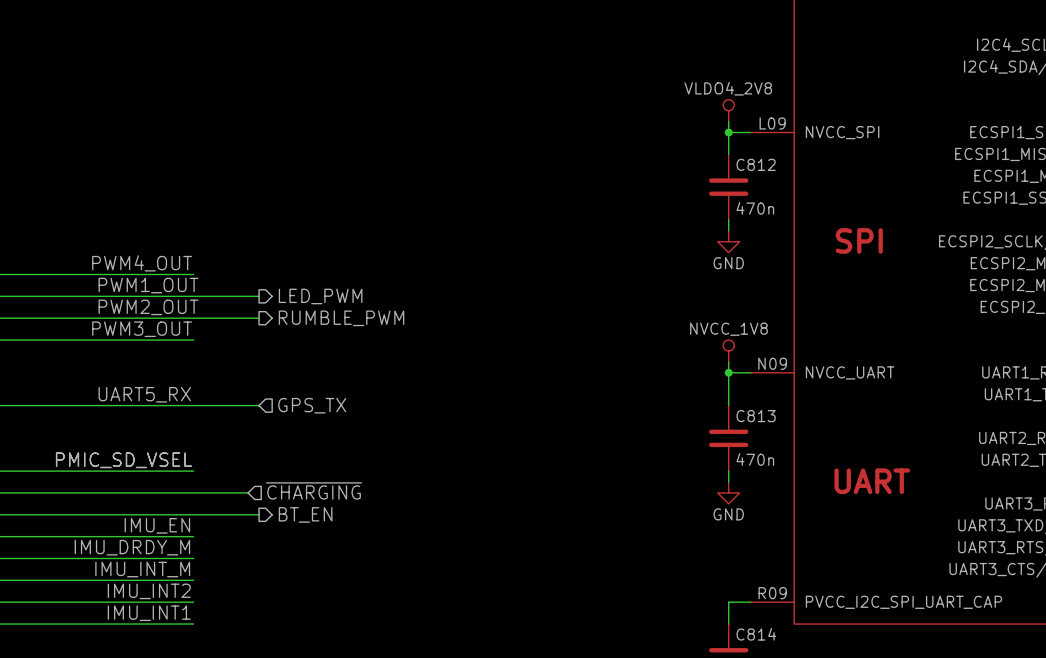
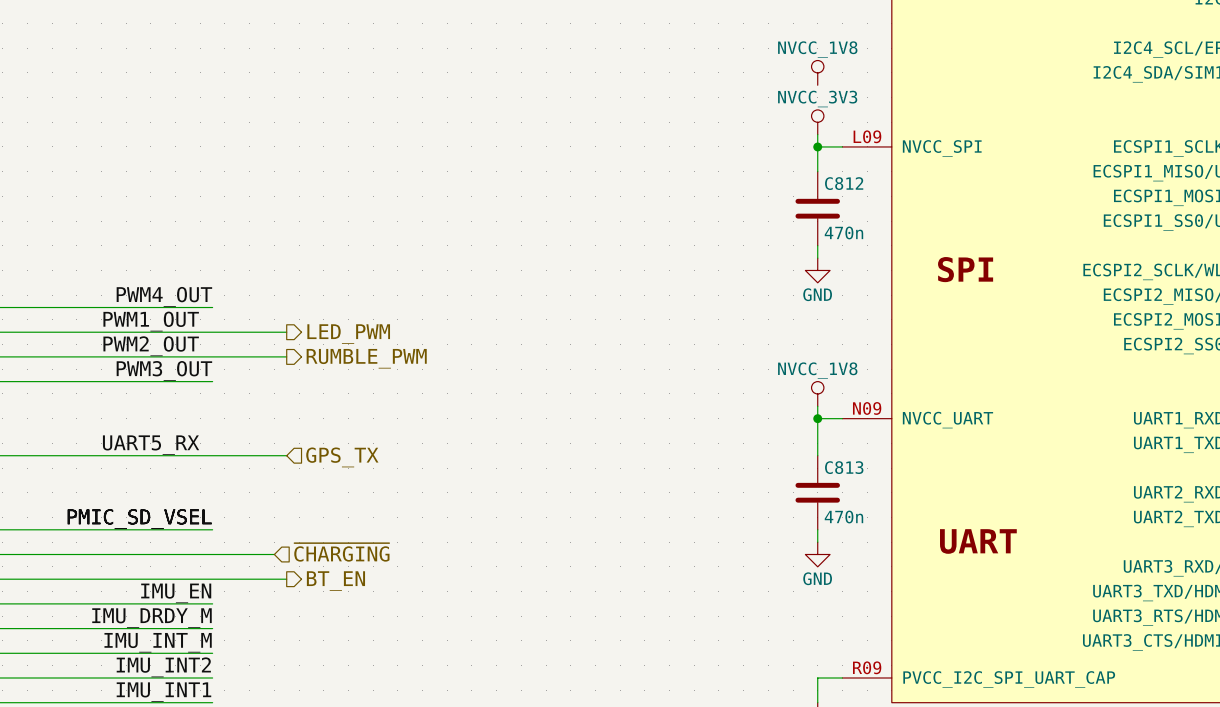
power symbol: none -> NVCC_1V8 (817, 72)
power symbol: VLDO4_2V8 (728, 110) -> NVCC_3V3 (817, 122)

